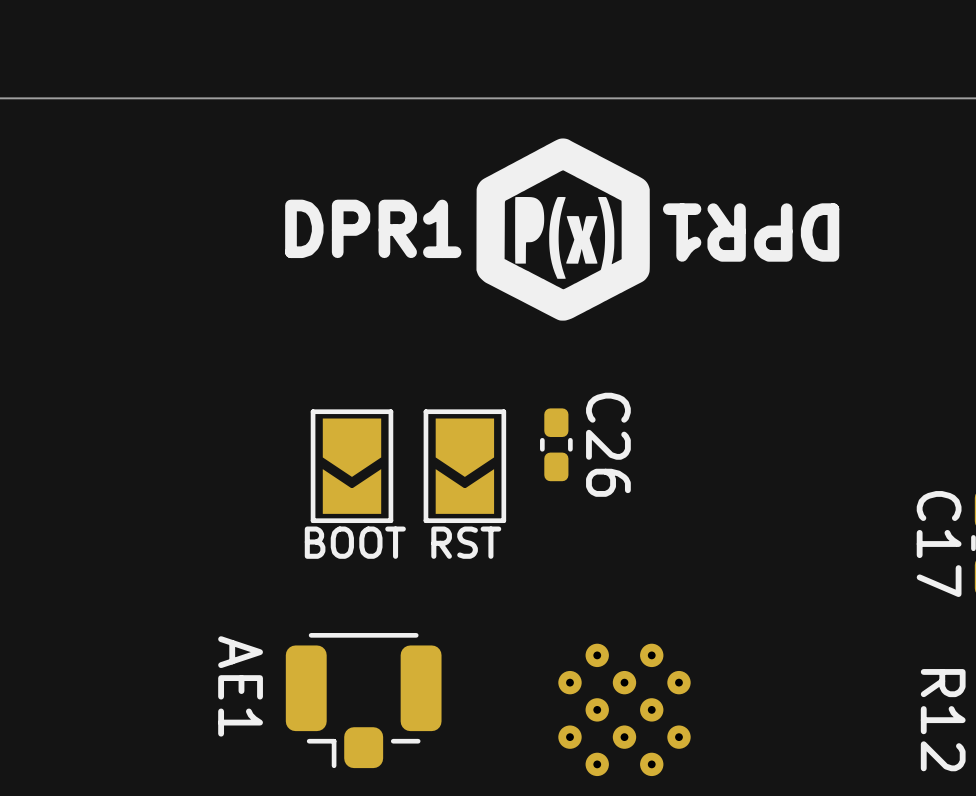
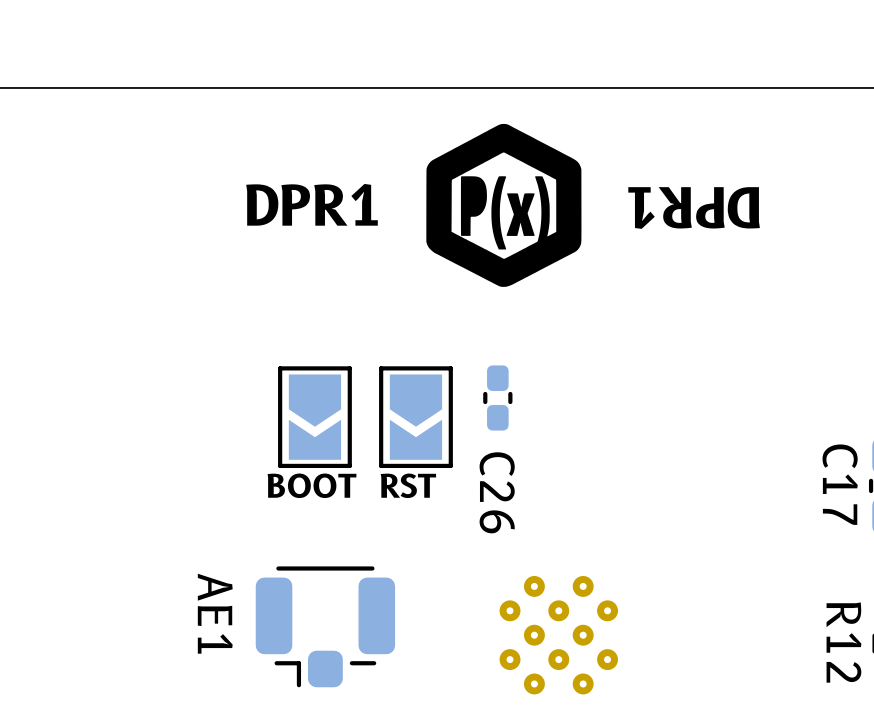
C26 name position: C26 (608, 444) -> C26 (497, 492)

